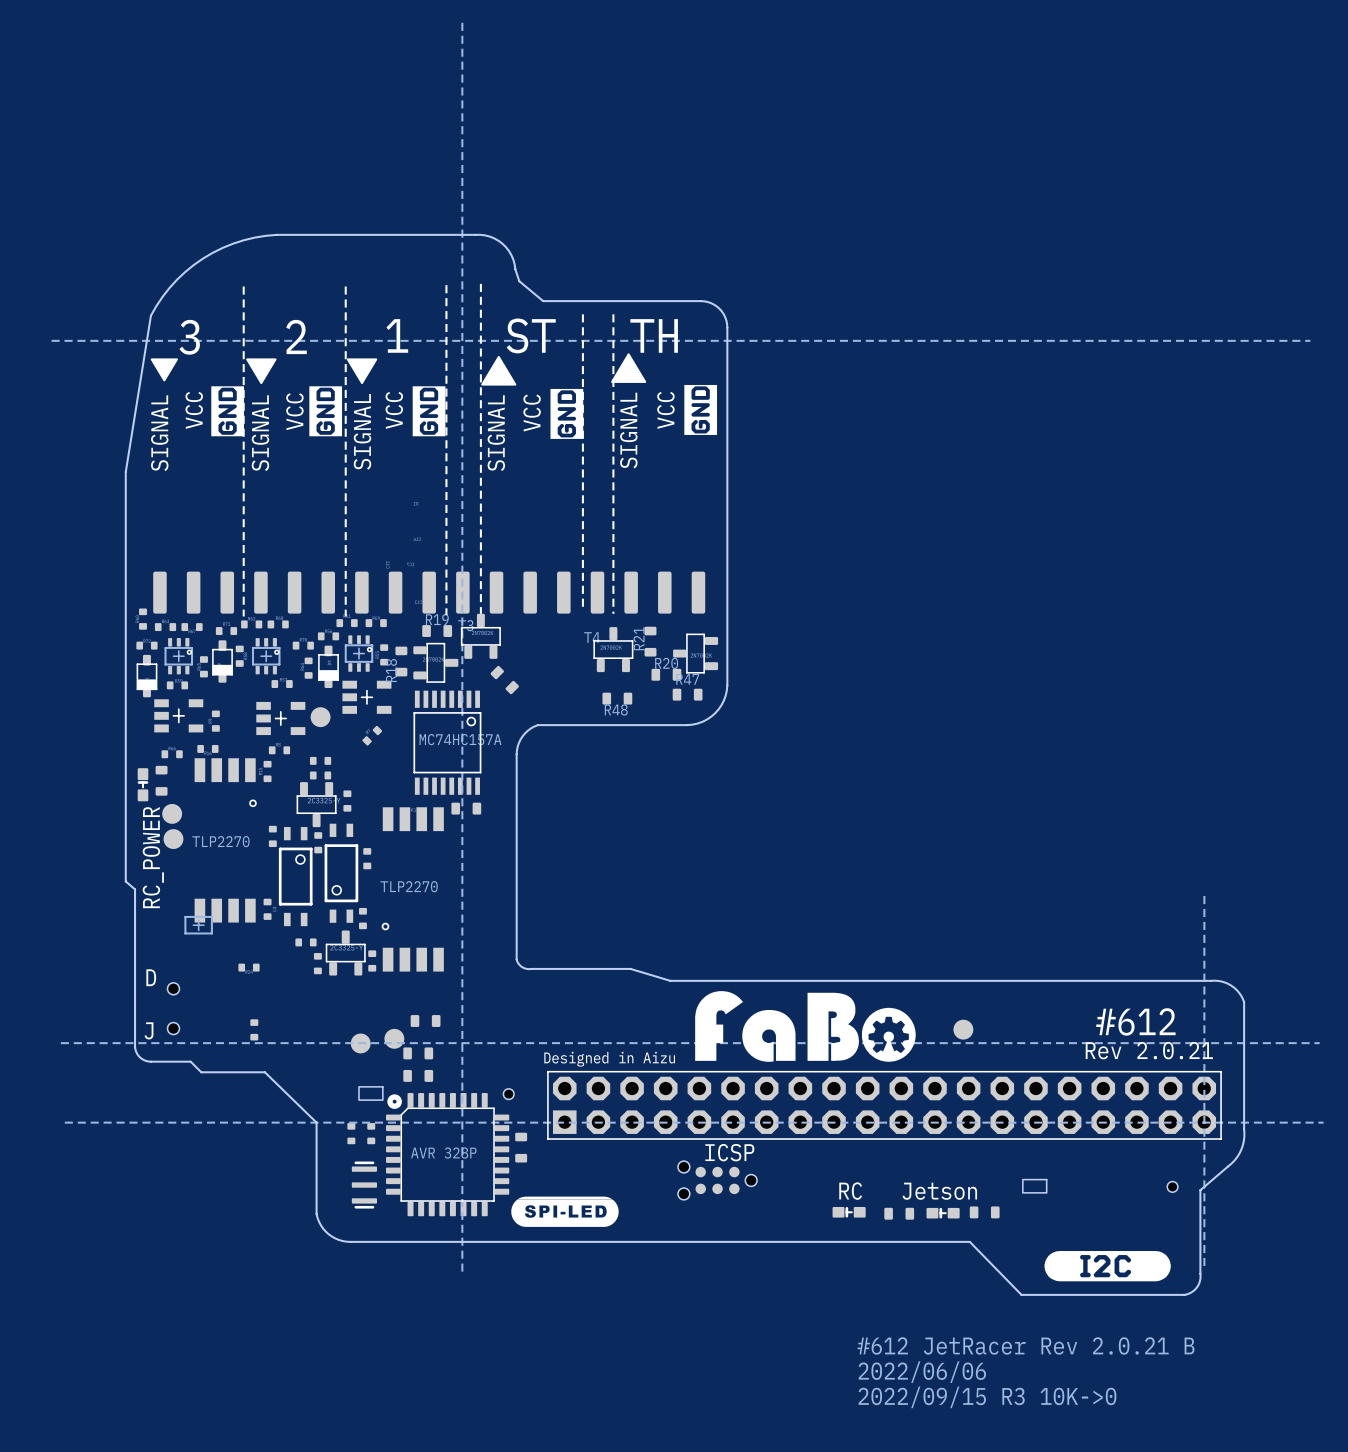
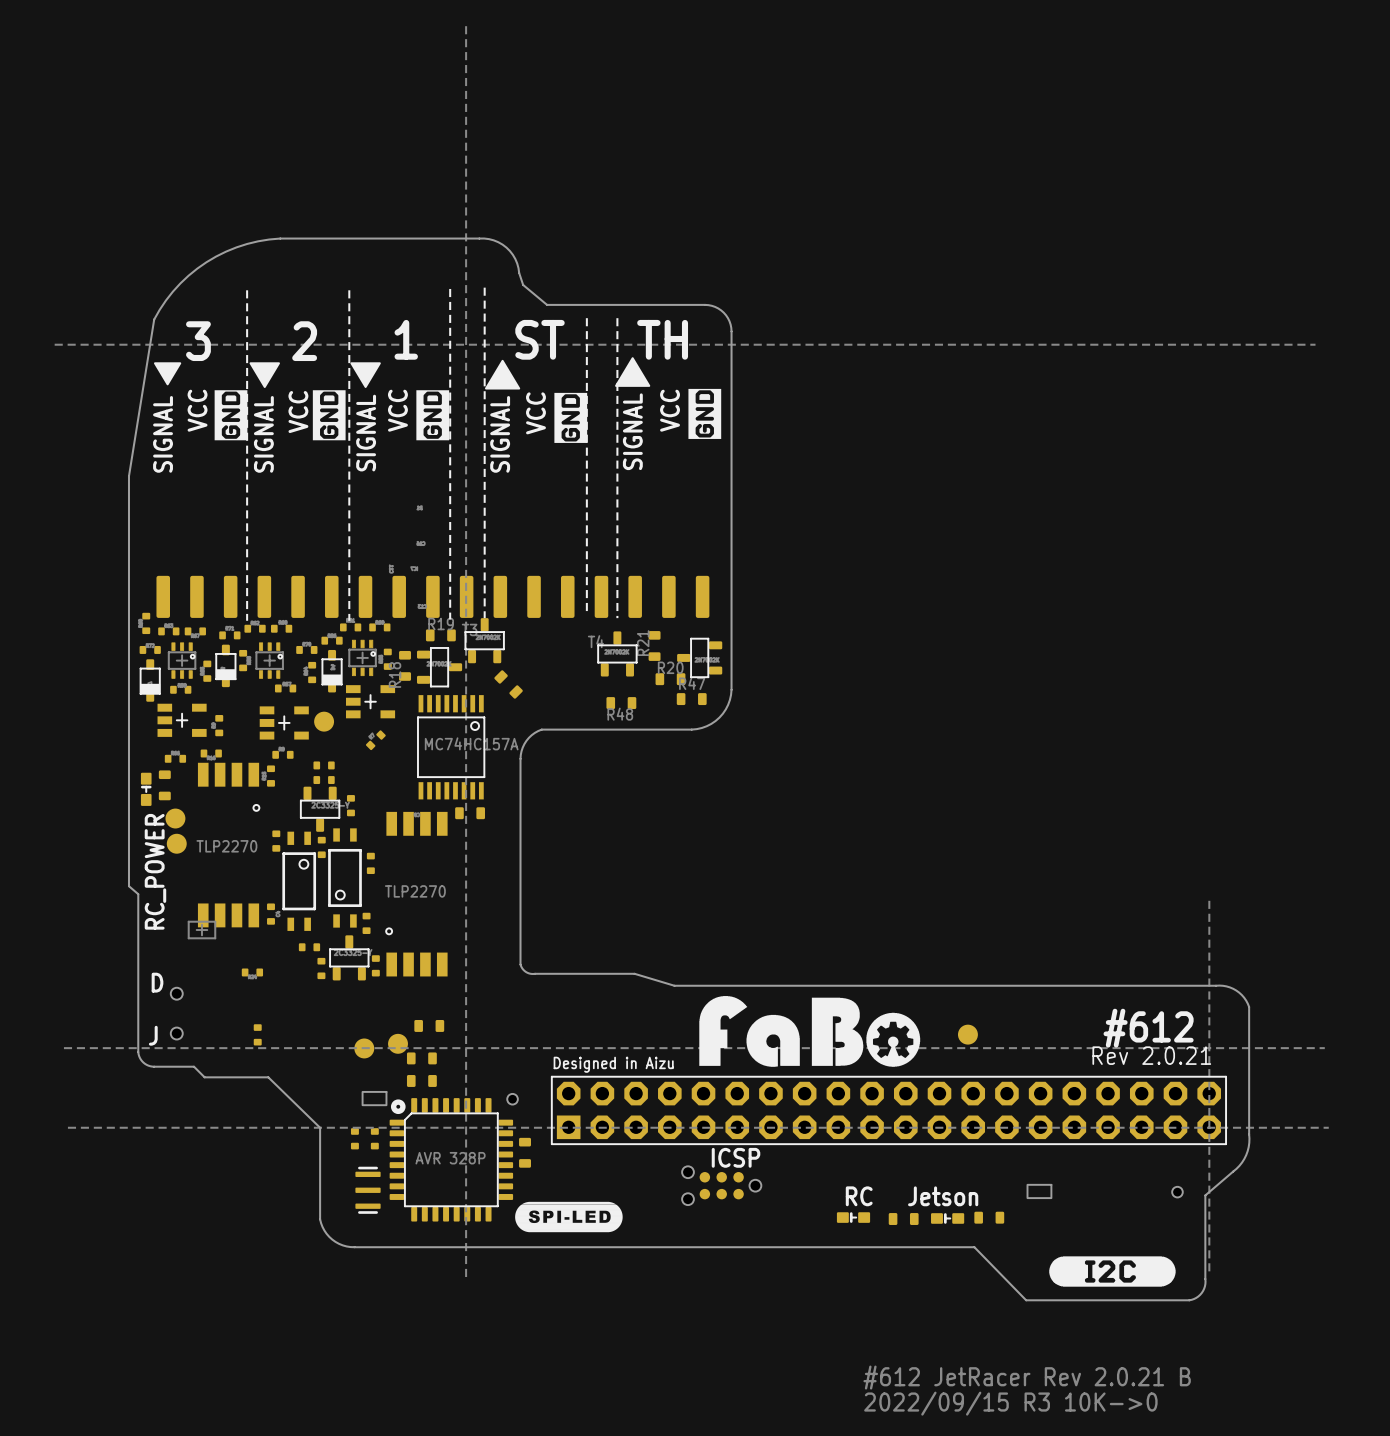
text: #612 JetRacer Rev 2.0.21 B (1026, 1345) -> none
text: 2022/06/06 (922, 1372) -> #612 JetRacer Rev 2.0.21 B (1027, 1377)

